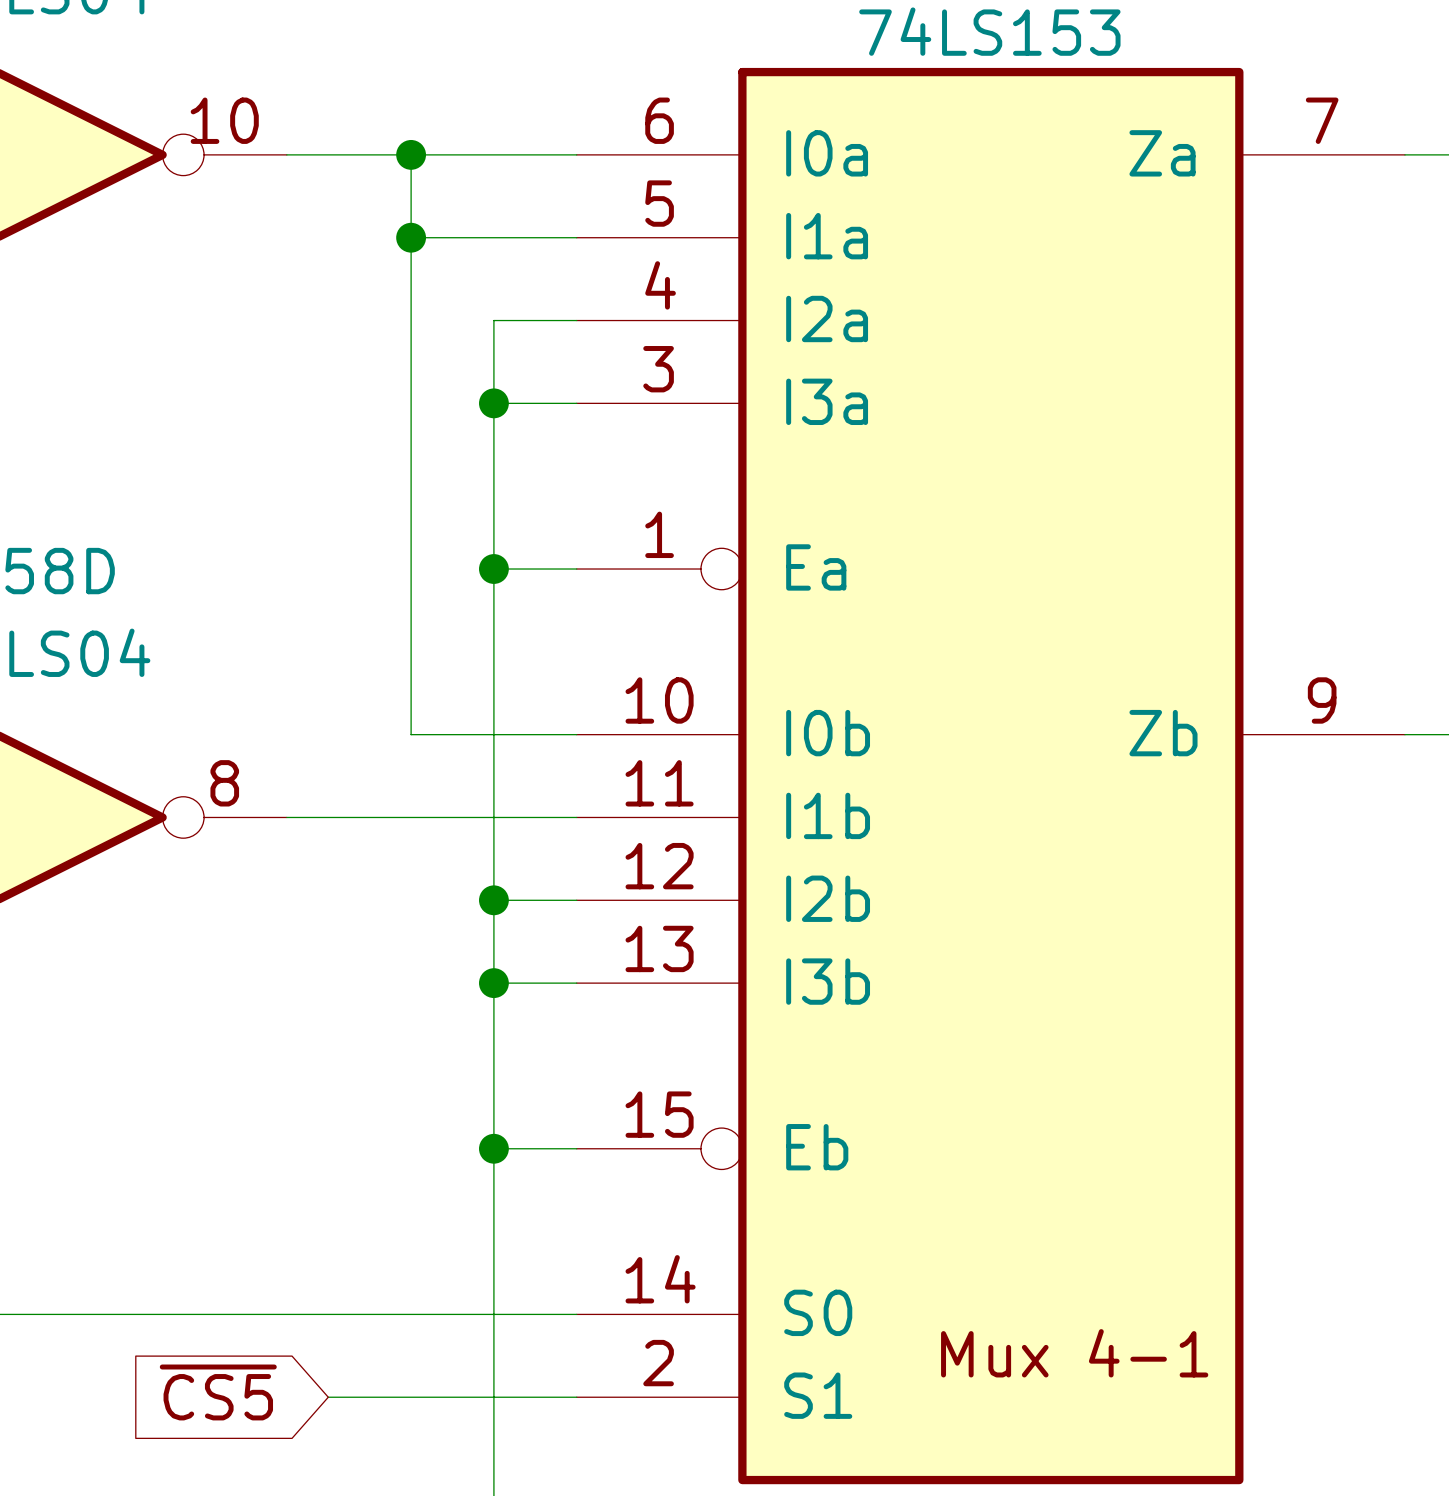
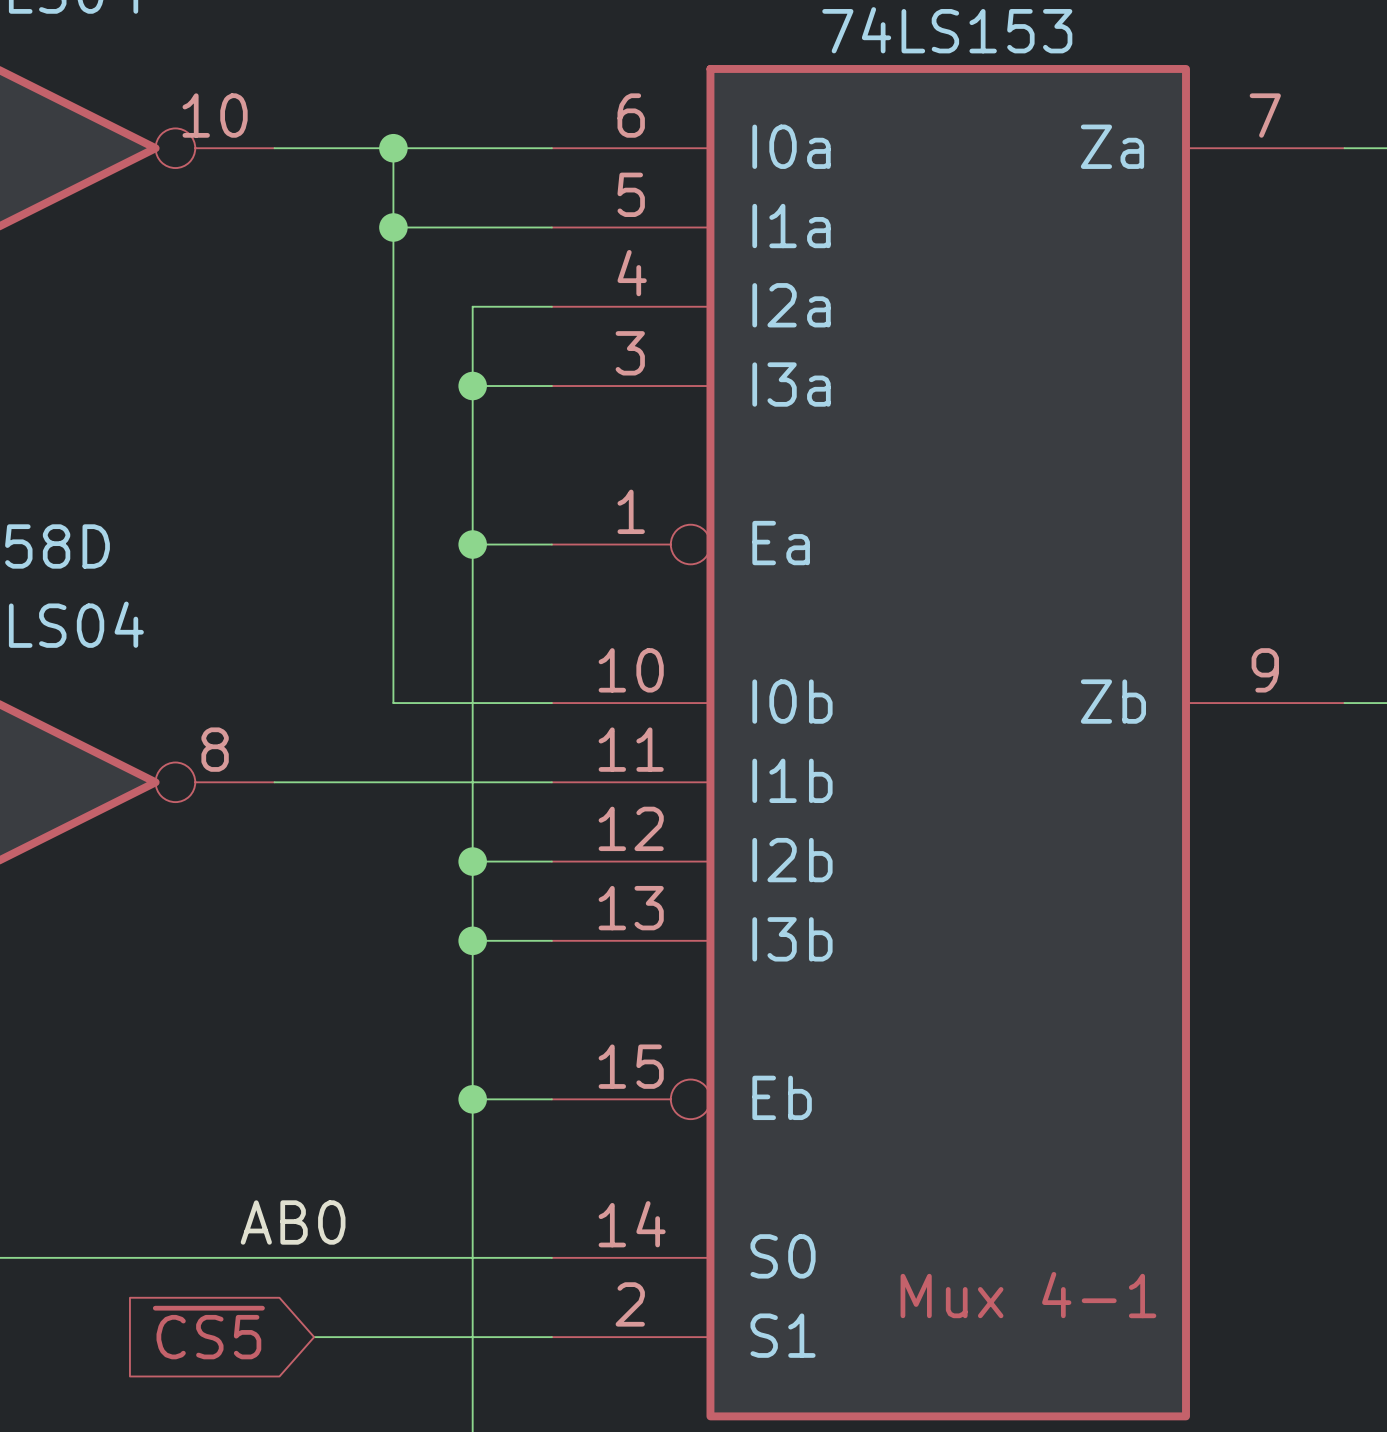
label: none -> AB0 (293, 1222)

